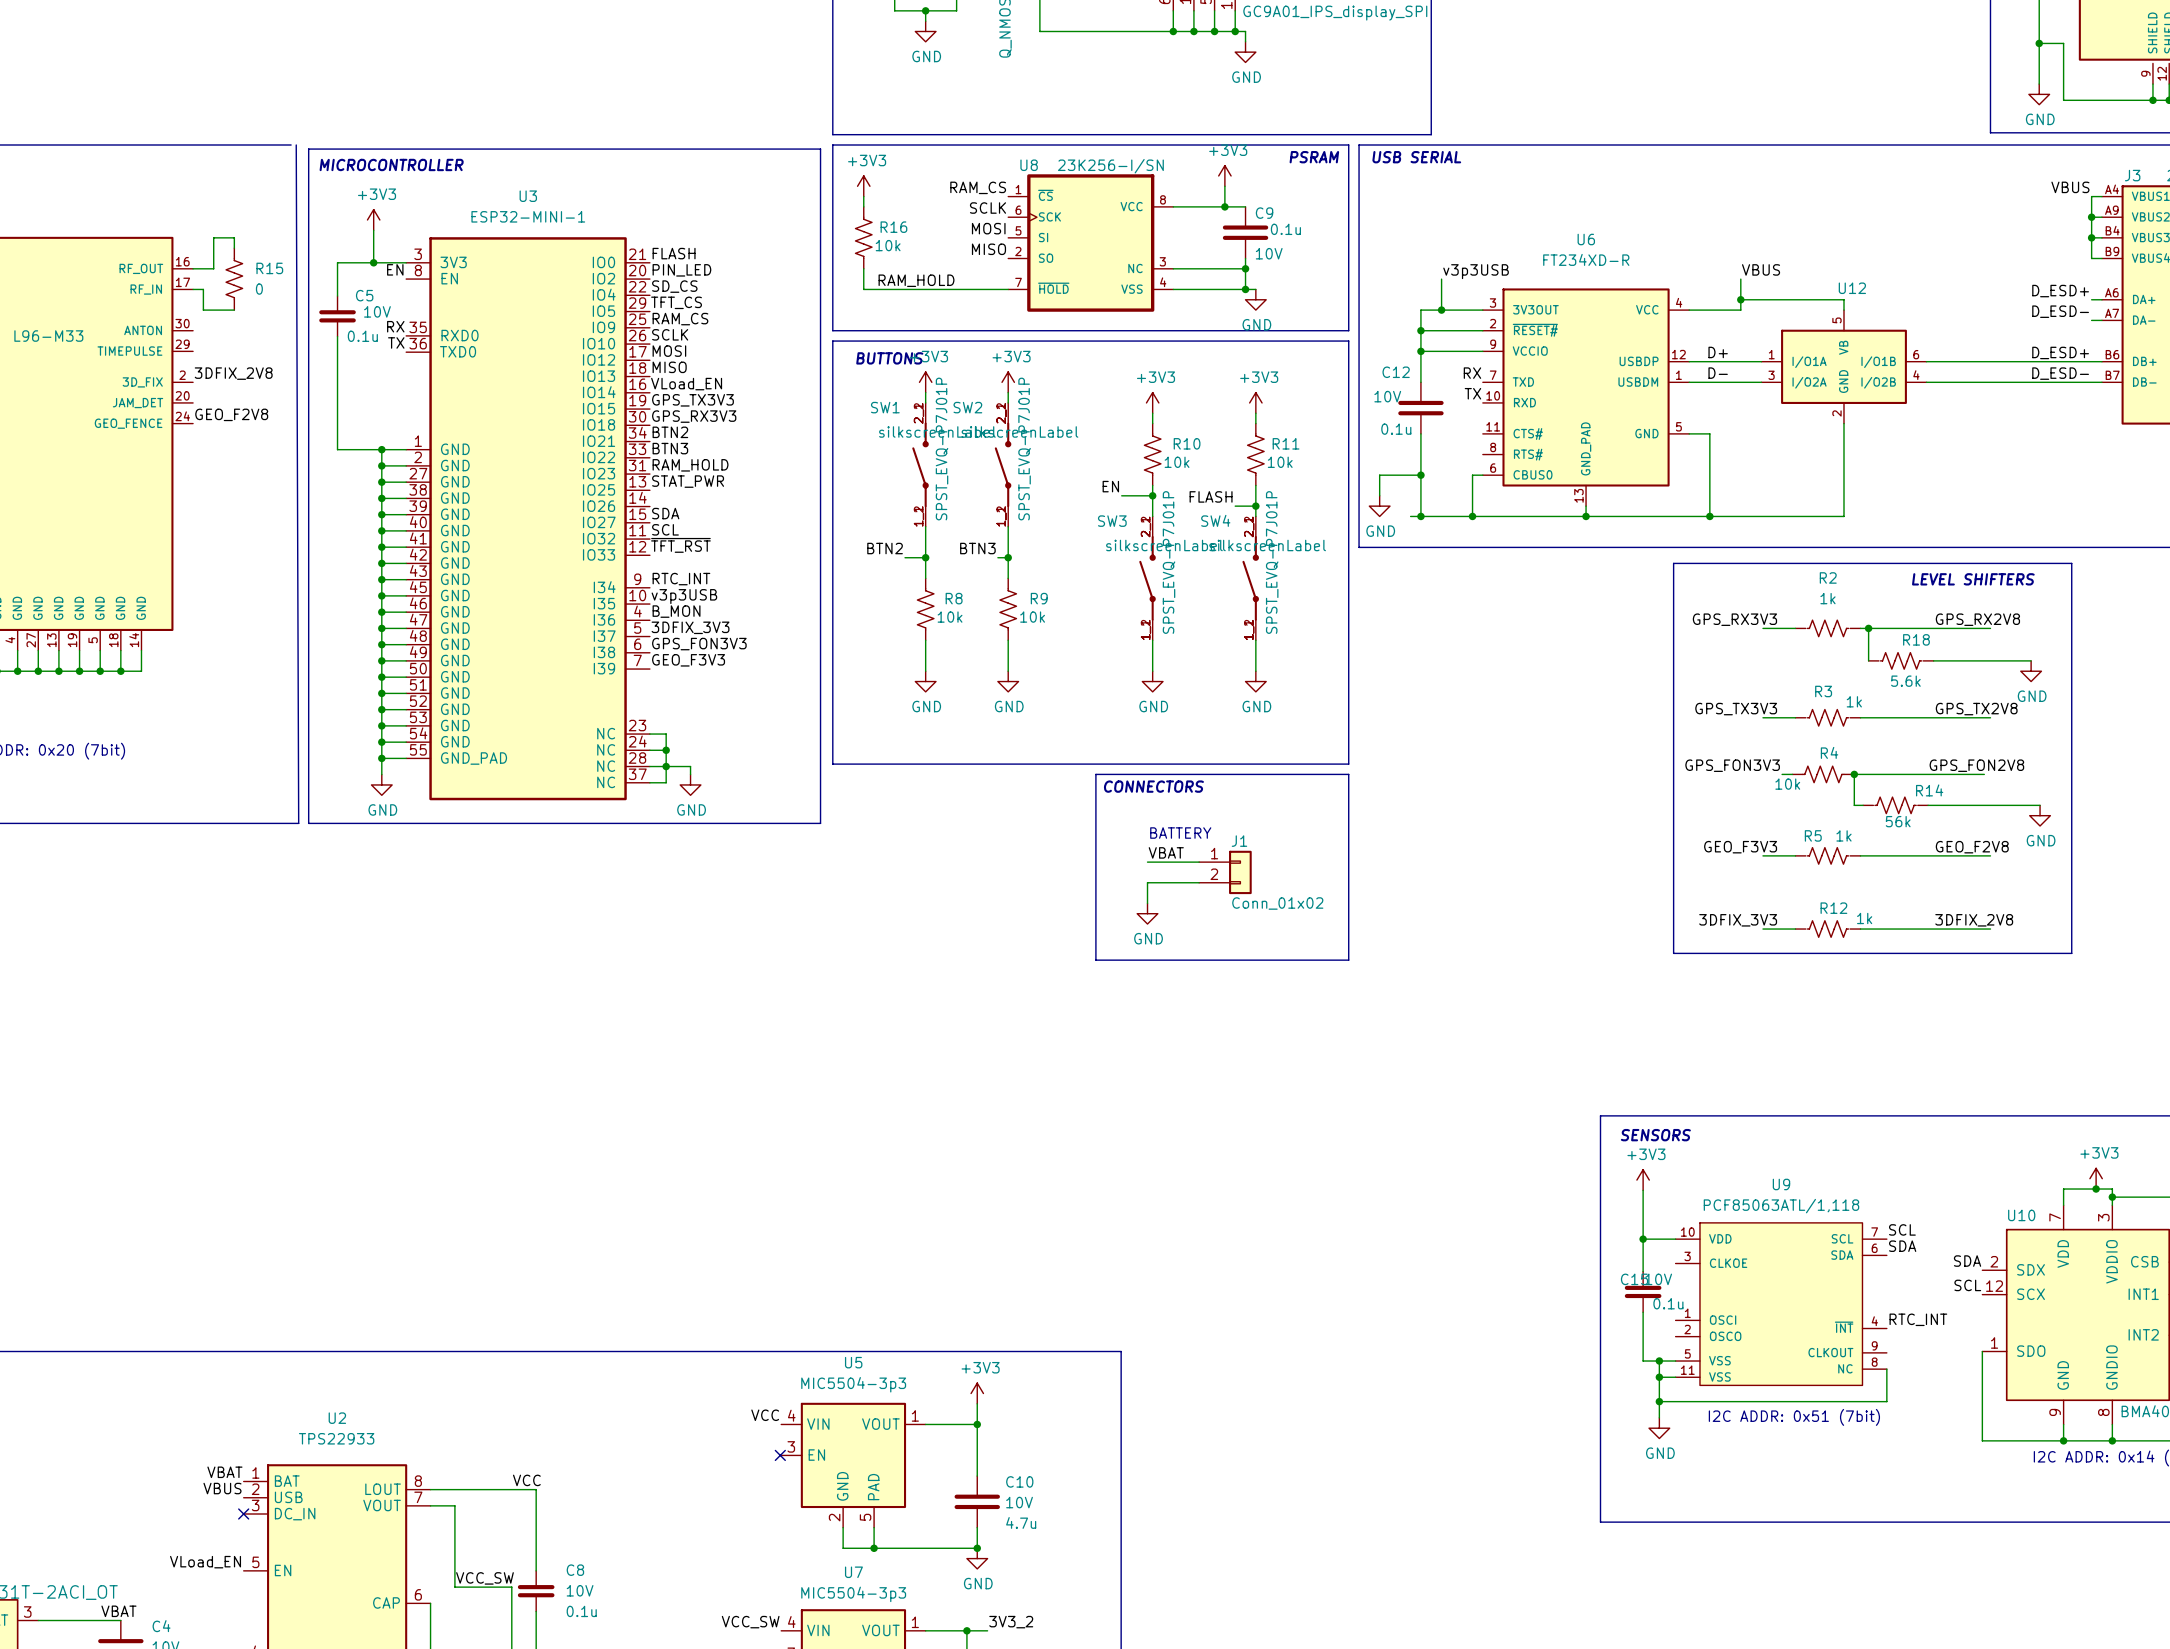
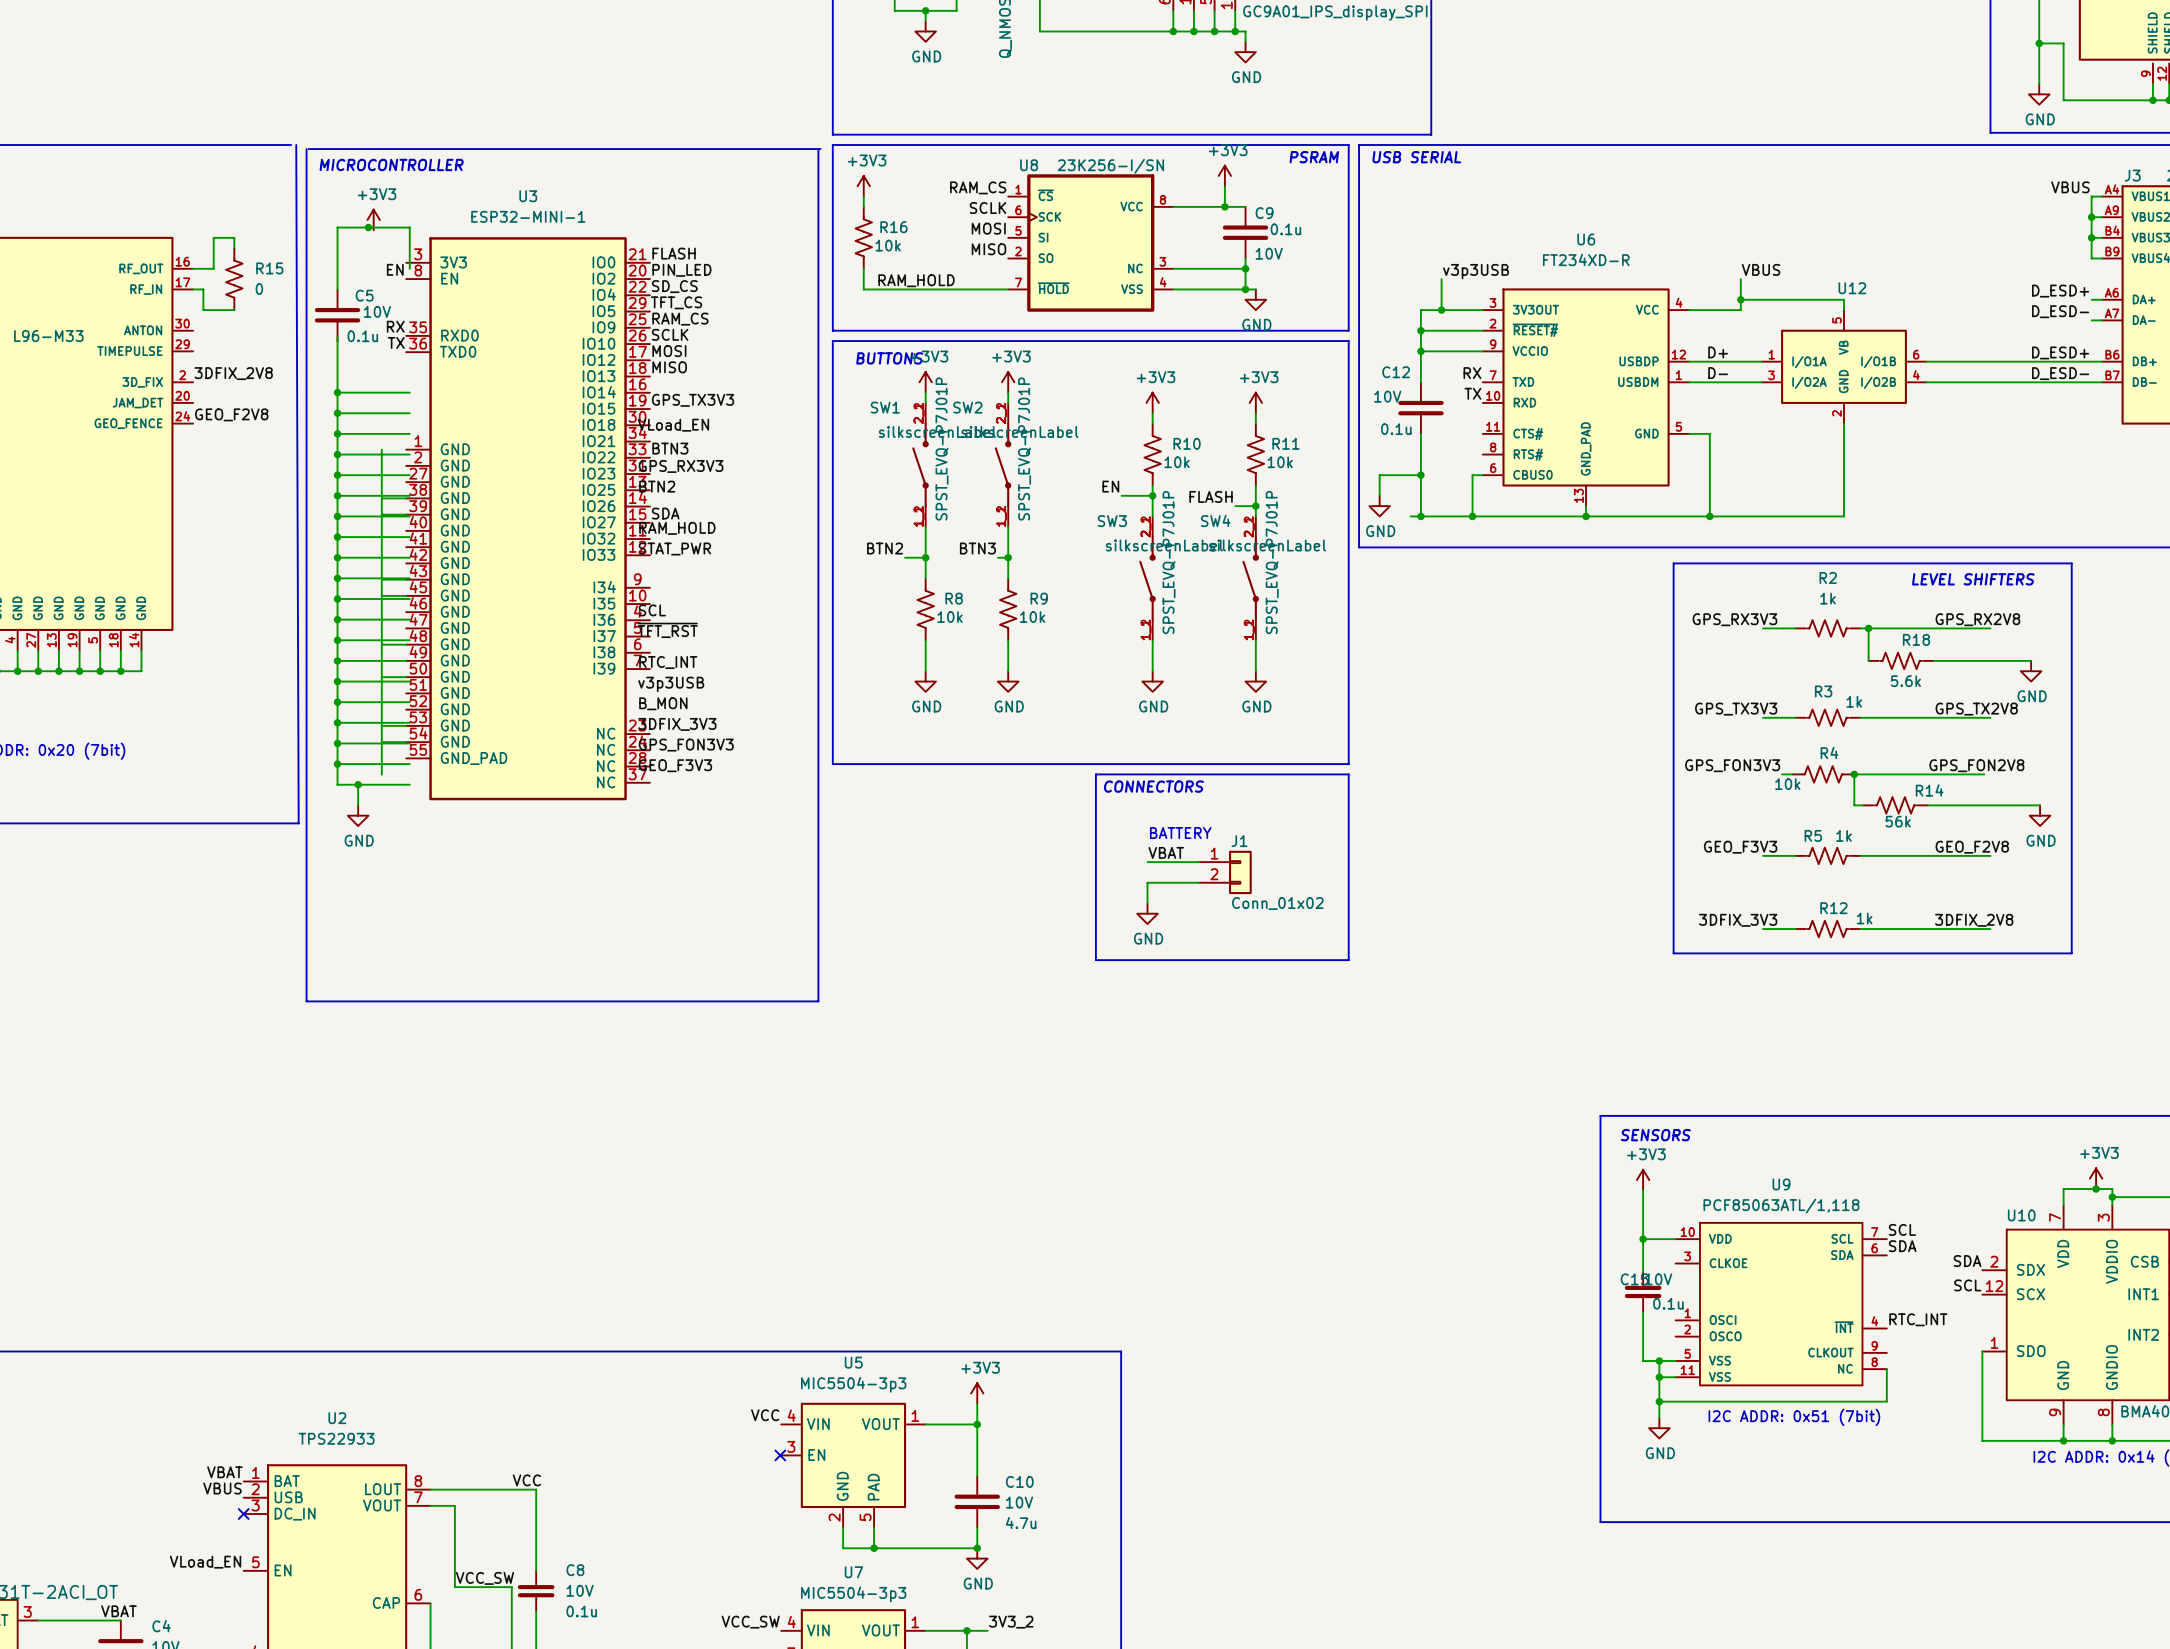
line: none -> (306, 149) (306, 1001) (818, 1001) (818, 149)
line: (308, 149) (308, 823) (820, 823) (820, 149) -> none
wire: (373, 230) (373, 262) -> none
wire: (337, 262) (406, 262) -> (337, 262) (337, 227) (409, 227) (409, 268)
junction position: (373, 262) -> (368, 227)
C5 symbol: [319, 296, 356, 337] -> [314, 289, 361, 342]
label position: VLoad_EN (686, 384) -> VLoad_EN (673, 425)
wire: none -> (337, 392) (409, 392)
junction: none -> (337, 392)
wire: none -> (337, 413) (409, 413)
junction: none -> (337, 413)
label position: GPS_RX3V3 (694, 416) -> GPS_RX3V3 (681, 466)
label position: BTN2 (670, 432) -> BTN2 (657, 486)
wire: none -> (337, 433) (409, 433)
junction: none -> (337, 433)
wire: (337, 449) (406, 449) -> (337, 449) (337, 784) (409, 784)
junction: (381, 449) -> none
wire: none -> (337, 454) (409, 454)
junction: none -> (337, 454)
wire: (381, 465) (406, 465) -> none
junction: (381, 465) -> none
label position: RAM_HOLD (690, 465) -> RAM_HOLD (677, 528)
wire: none -> (337, 475) (409, 475)
junction: none -> (337, 475)
label position: STAT_PWR (688, 481) -> STAT_PWR (674, 549)
wire: (381, 482) (406, 482) -> none
junction: (381, 482) -> none
wire: none -> (337, 495) (409, 495)
junction: none -> (337, 495)
junction: (381, 498) -> none
junction: (381, 514) -> none
wire: none -> (337, 516) (409, 516)
junction: none -> (337, 516)
label position: SCL (665, 529) -> SCL (652, 610)
wire: (381, 530) (406, 530) -> none
junction: (381, 530) -> none
wire: none -> (337, 537) (409, 537)
junction: none -> (337, 537)
label position: ~{TFT_RST} (680, 545) -> ~{TFT_RST} (667, 630)
wire: (381, 547) (406, 547) -> none
junction: (381, 547) -> none
wire: none -> (337, 557) (409, 557)
junction: none -> (337, 557)
wire: (381, 563) (406, 563) -> none
junction: (381, 563) -> none
wire: none -> (337, 578) (409, 578)
junction: none -> (337, 578)
junction: (381, 579) -> none
label position: RTC_INT (681, 579) -> RTC_INT (668, 662)
junction: (381, 595) -> none
label position: v3p3USB (684, 596) -> v3p3USB (671, 684)
wire: none -> (337, 599) (409, 599)
junction: none -> (337, 599)
label position: B_MON (676, 611) -> B_MON (663, 703)
wire: (381, 612) (406, 612) -> none
junction: (381, 612) -> none
wire: none -> (337, 619) (409, 619)
junction: none -> (337, 619)
label position: 3DFIX_3V3 (690, 627) -> 3DFIX_3V3 (677, 724)
wire: (381, 628) (406, 628) -> none
junction: (381, 628) -> none
wire: none -> (337, 640) (409, 640)
junction: none -> (337, 640)
junction: (381, 644) -> none
label position: GPS_FON3V3 (699, 644) -> GPS_FON3V3 (686, 745)
wire: none -> (337, 660) (381, 660)
junction: none -> (337, 660)
junction: (381, 660) -> none
label position: GEO_F3V3 (688, 660) -> GEO_F3V3 (675, 765)
junction: (381, 677) -> none
wire: none -> (337, 681) (409, 681)
junction: none -> (337, 681)
wire: (381, 693) (406, 693) -> none
junction: (381, 693) -> none
wire: none -> (337, 702) (409, 702)
junction: none -> (337, 702)
wire: (381, 709) (406, 709) -> none
junction: (381, 709) -> none
wire: none -> (337, 722) (409, 722)
junction: none -> (337, 722)
junction: (381, 725) -> none
wire: (649, 734) (666, 734) (666, 782) (649, 782) -> none
junction: (381, 742) -> none
wire: none -> (337, 743) (409, 743)
junction: none -> (337, 743)
wire: (649, 750) (666, 750) -> none
junction: (666, 750) -> none
wire: (381, 758) (406, 758) -> none
junction: (381, 758) -> none
wire: none -> (337, 764) (409, 764)
junction: none -> (337, 764)
wire: (649, 766) (690, 766) (690, 774) -> none
junction: (666, 766) -> none
wire: none -> (358, 784) (358, 805)
junction: none -> (358, 784)
power symbol position: GND (381, 784) -> GND (358, 815)
power symbol: GND (690, 784) -> none

